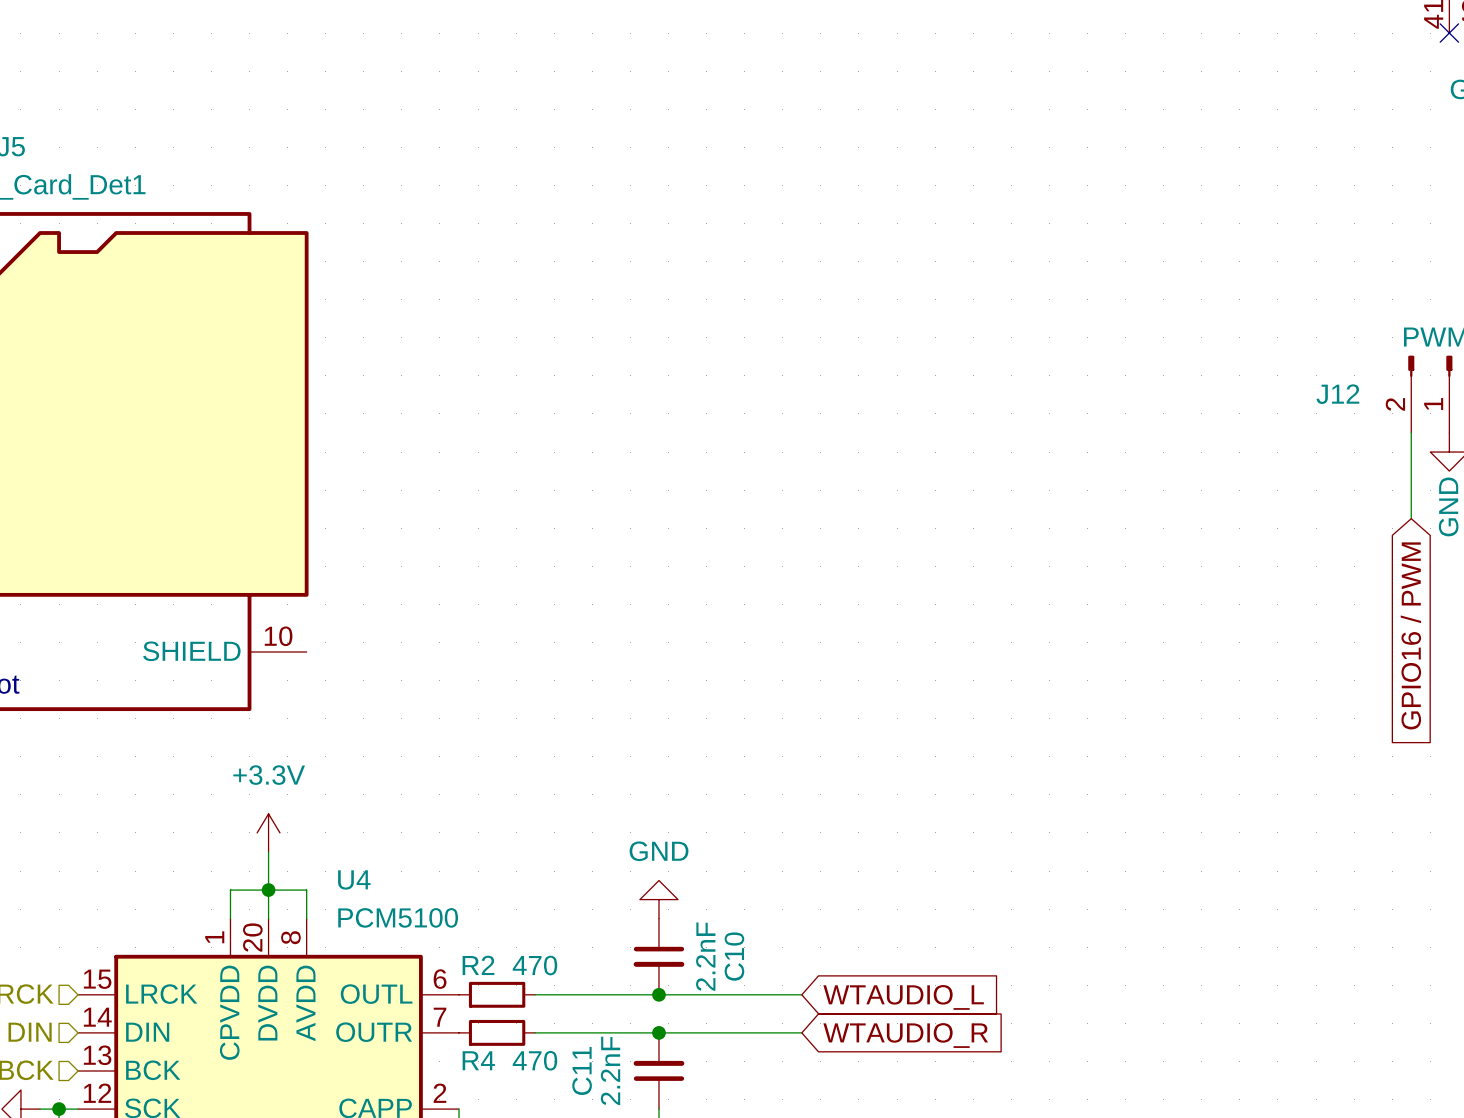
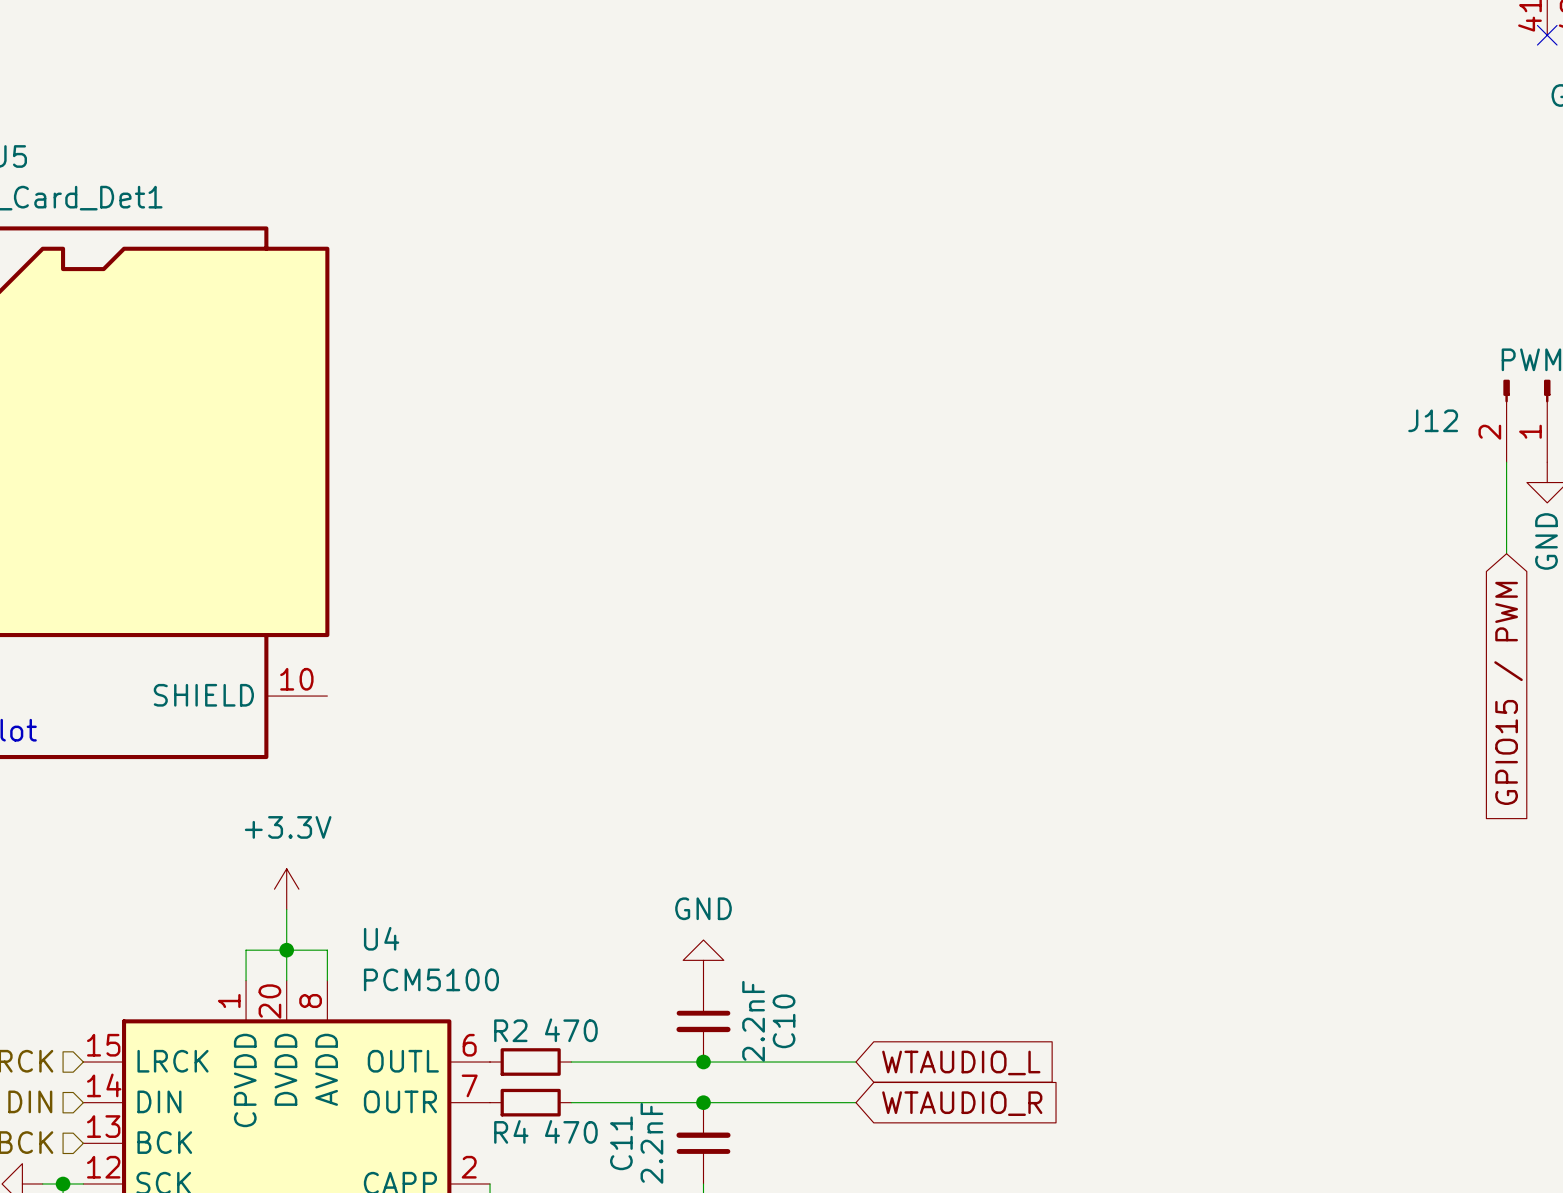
global label: GPIO16 / PWM (1410, 635) -> GPIO15 / PWM (1508, 693)

